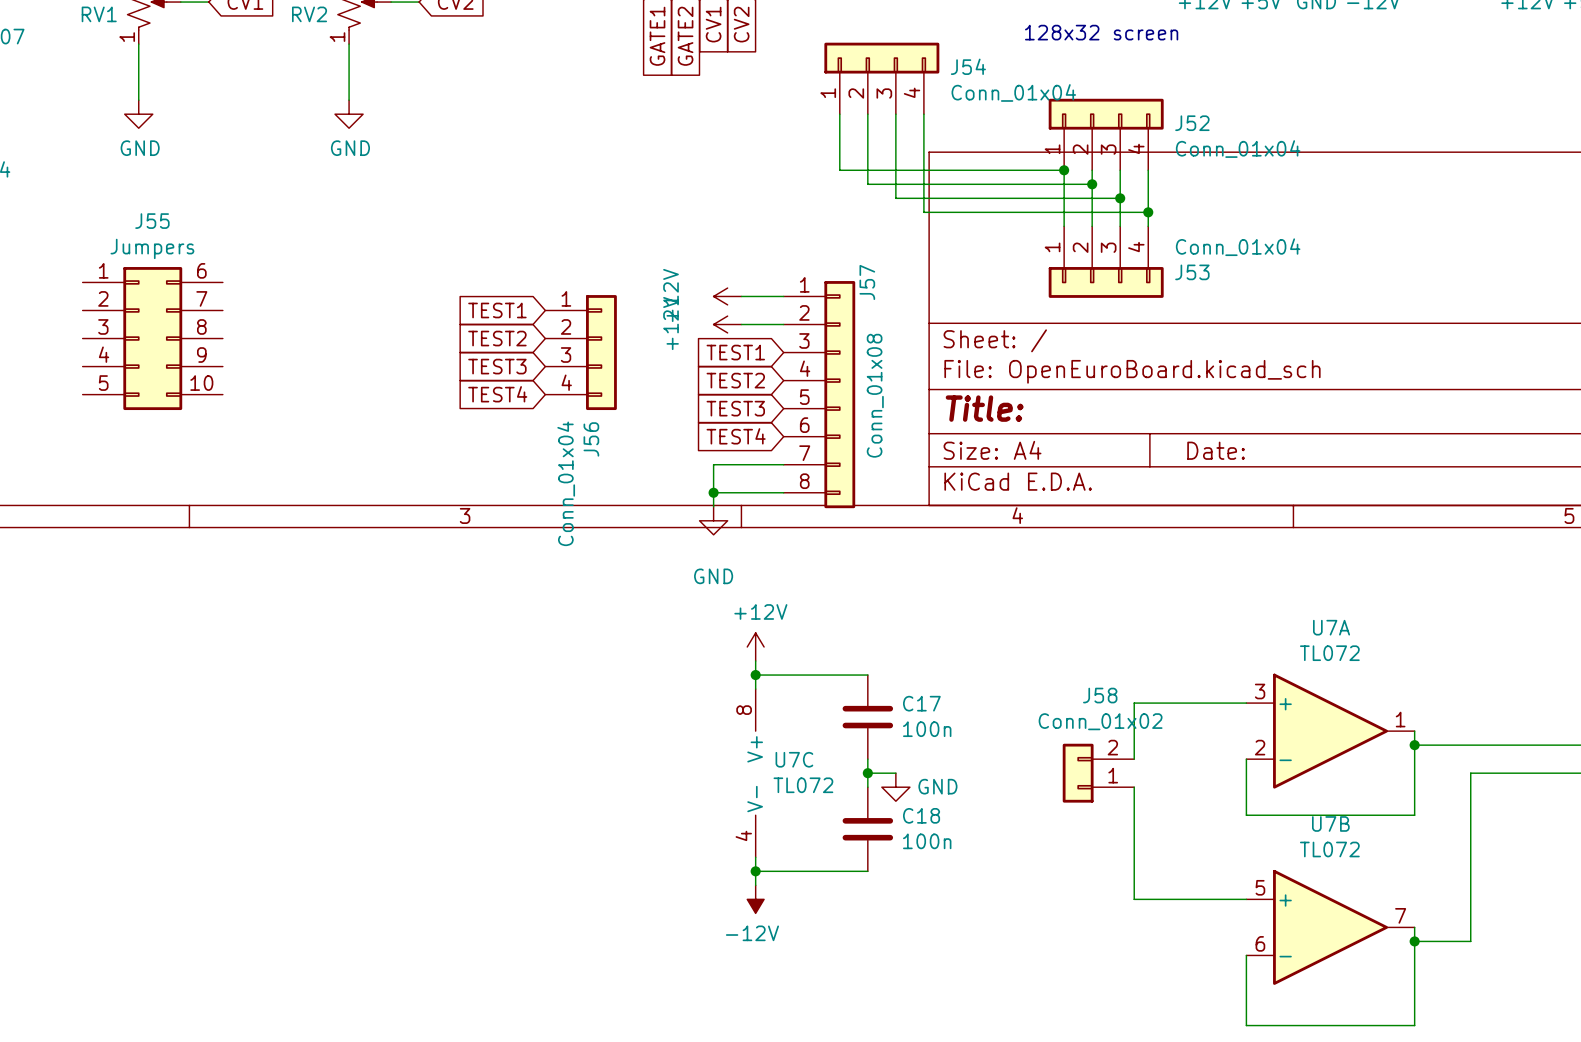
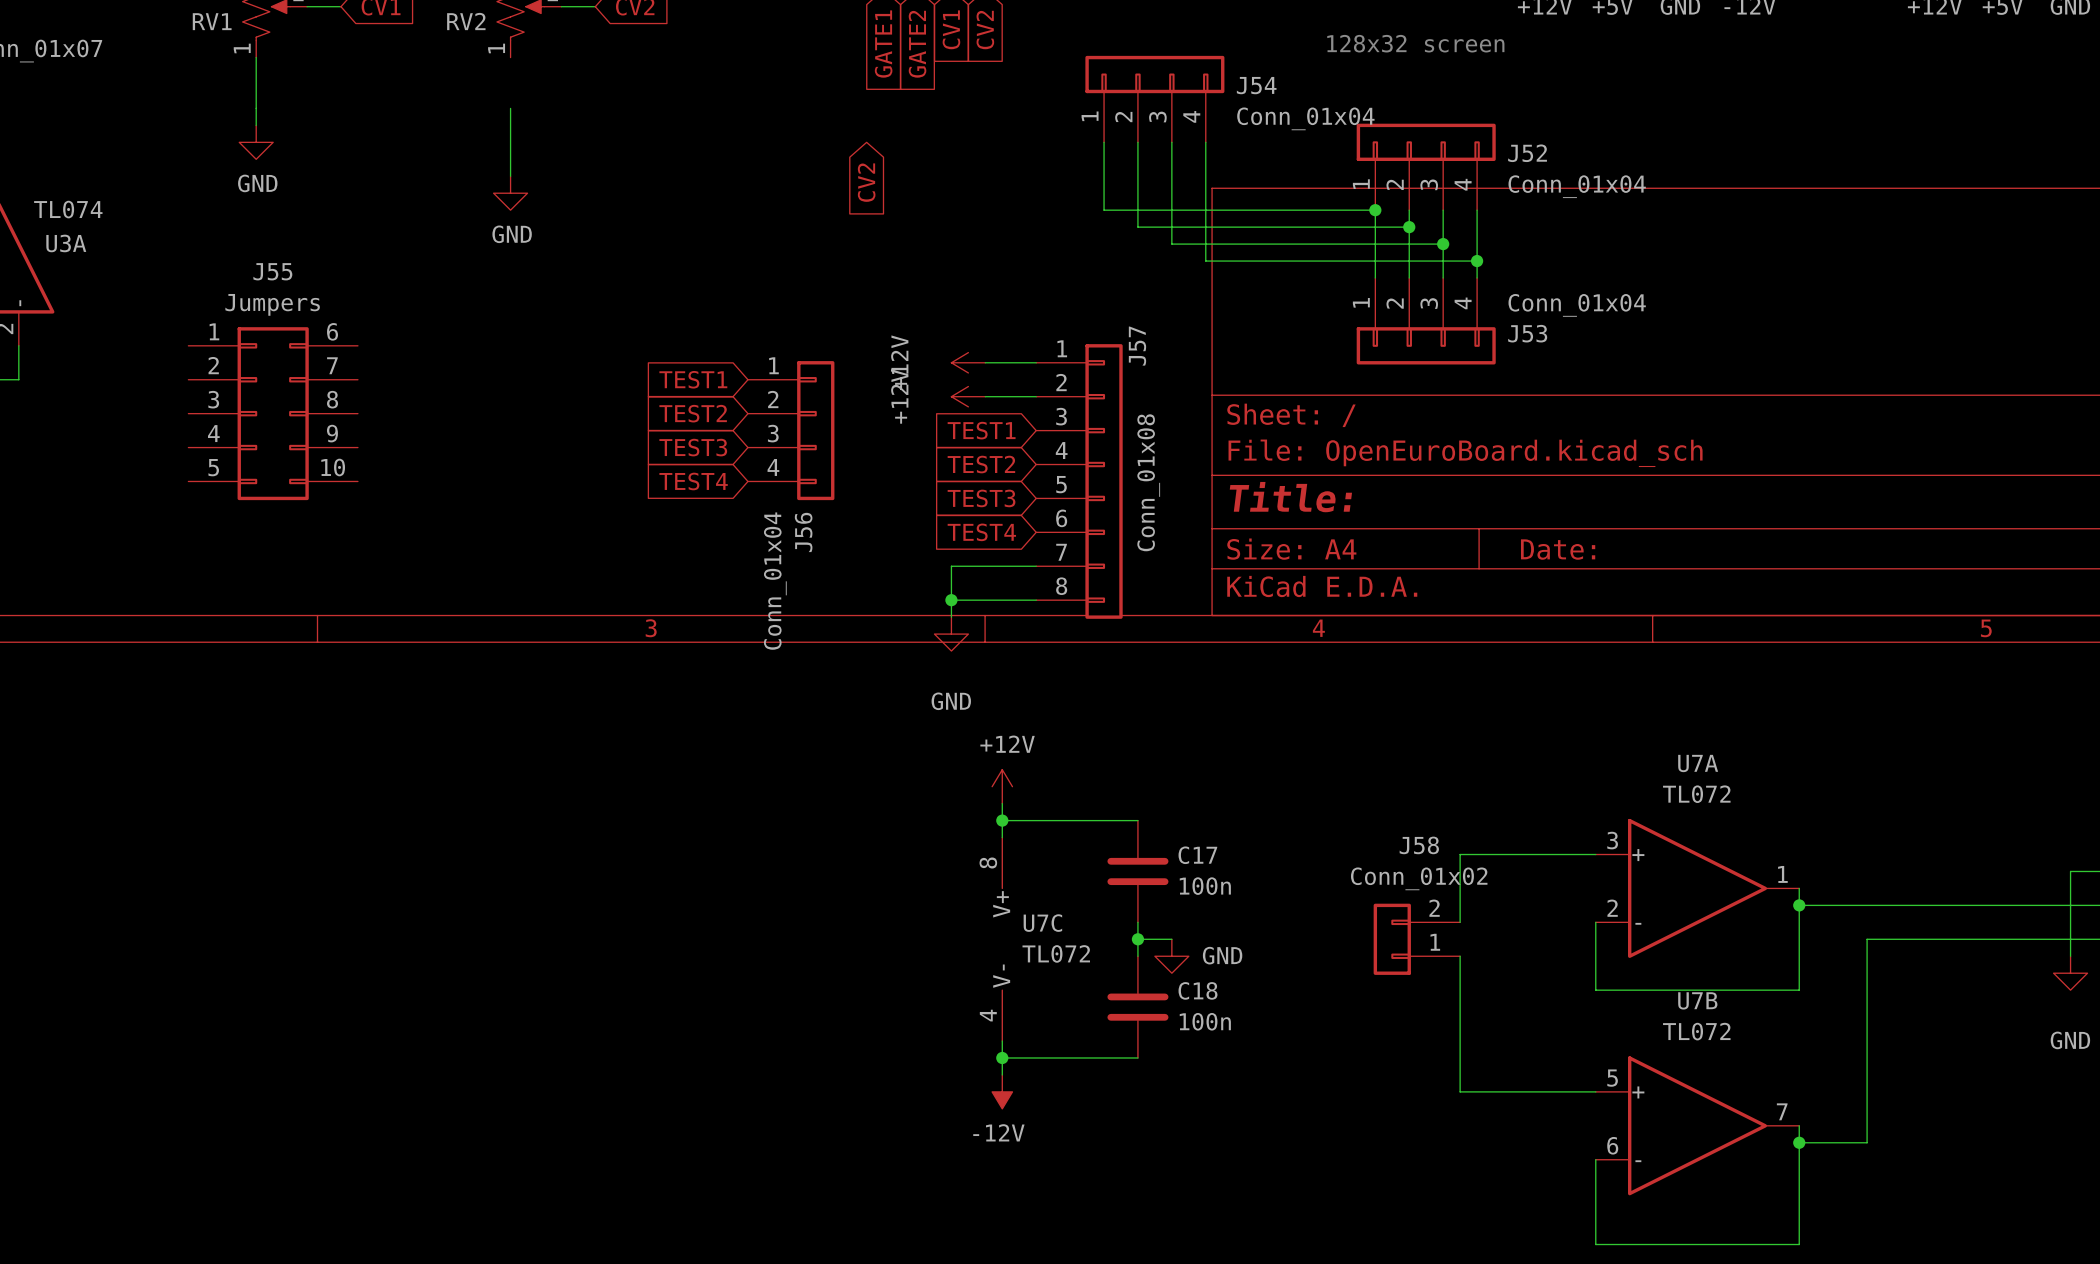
wire: (349, 44) (349, 86) -> (510, 125) (510, 176)
power symbol position: GND (349, 114) -> GND (510, 193)
global label: none -> CV2 (866, 182)

